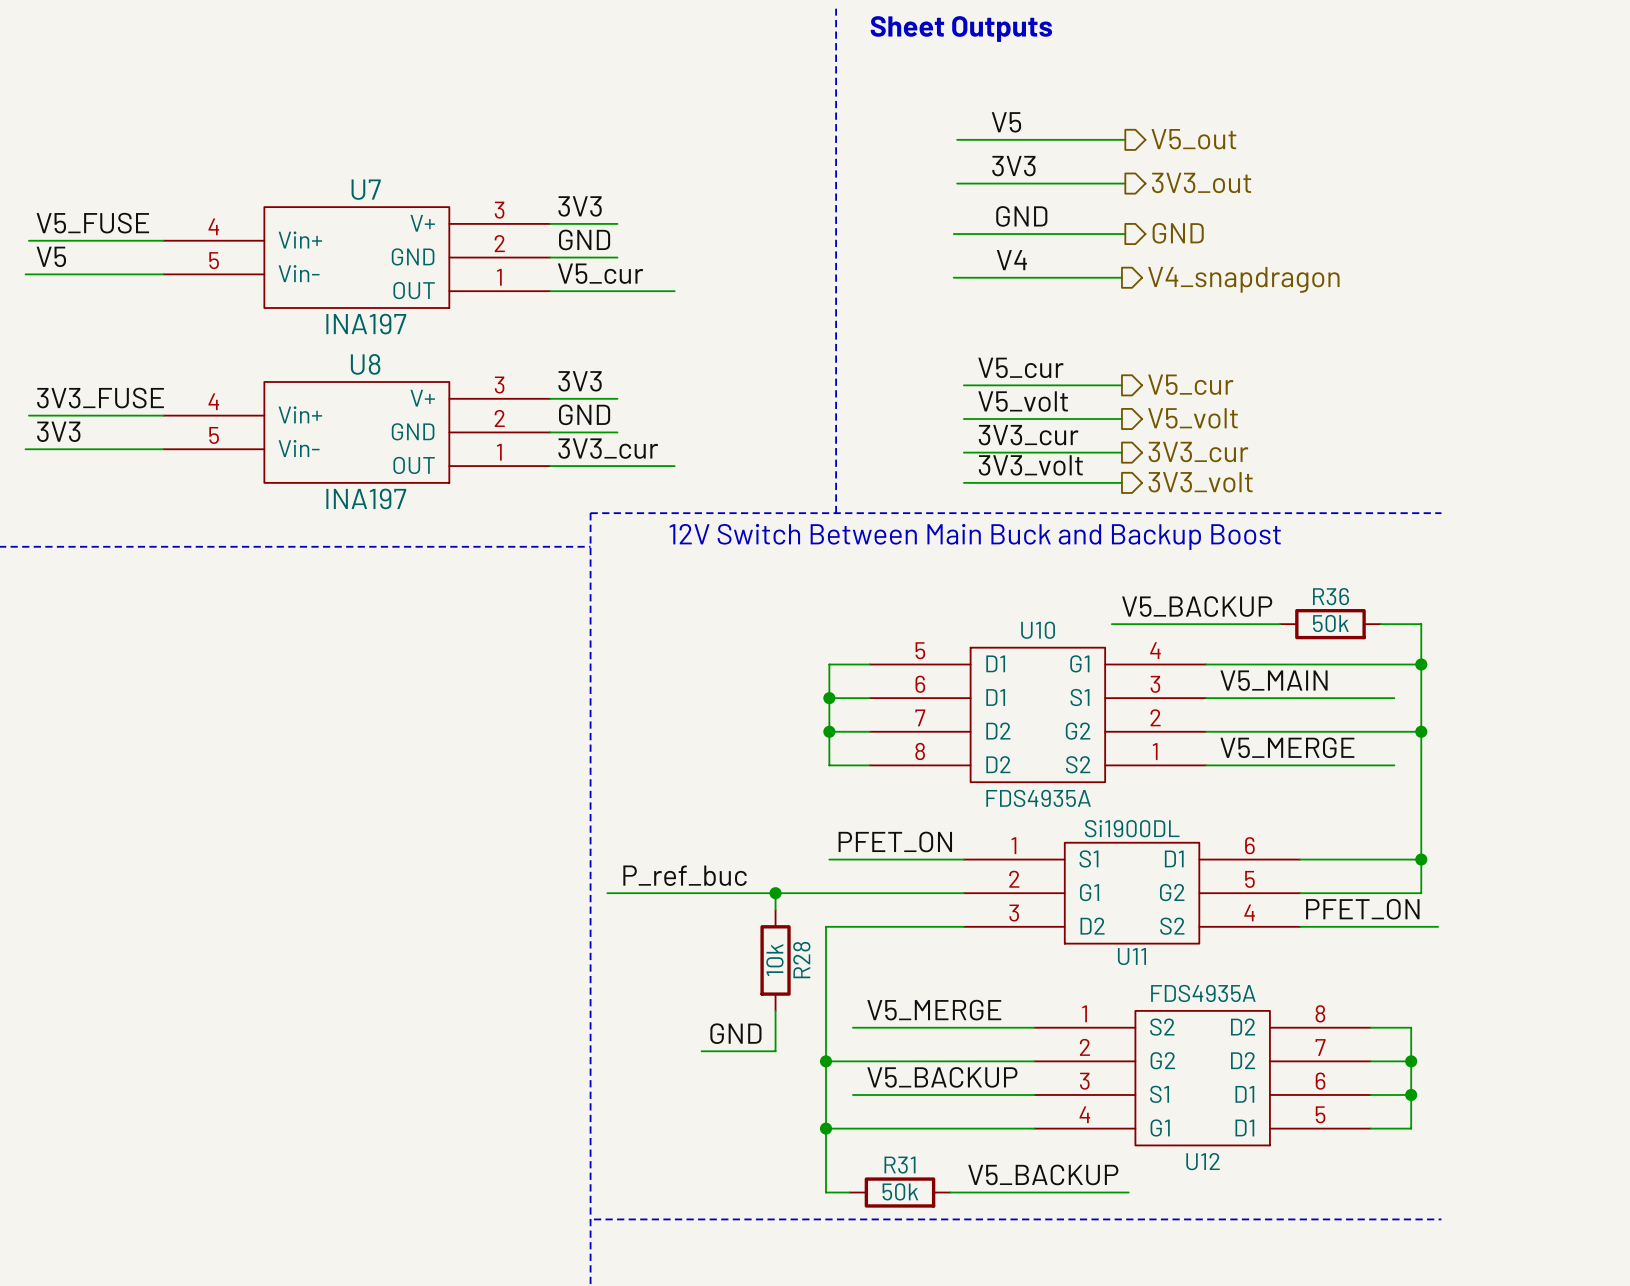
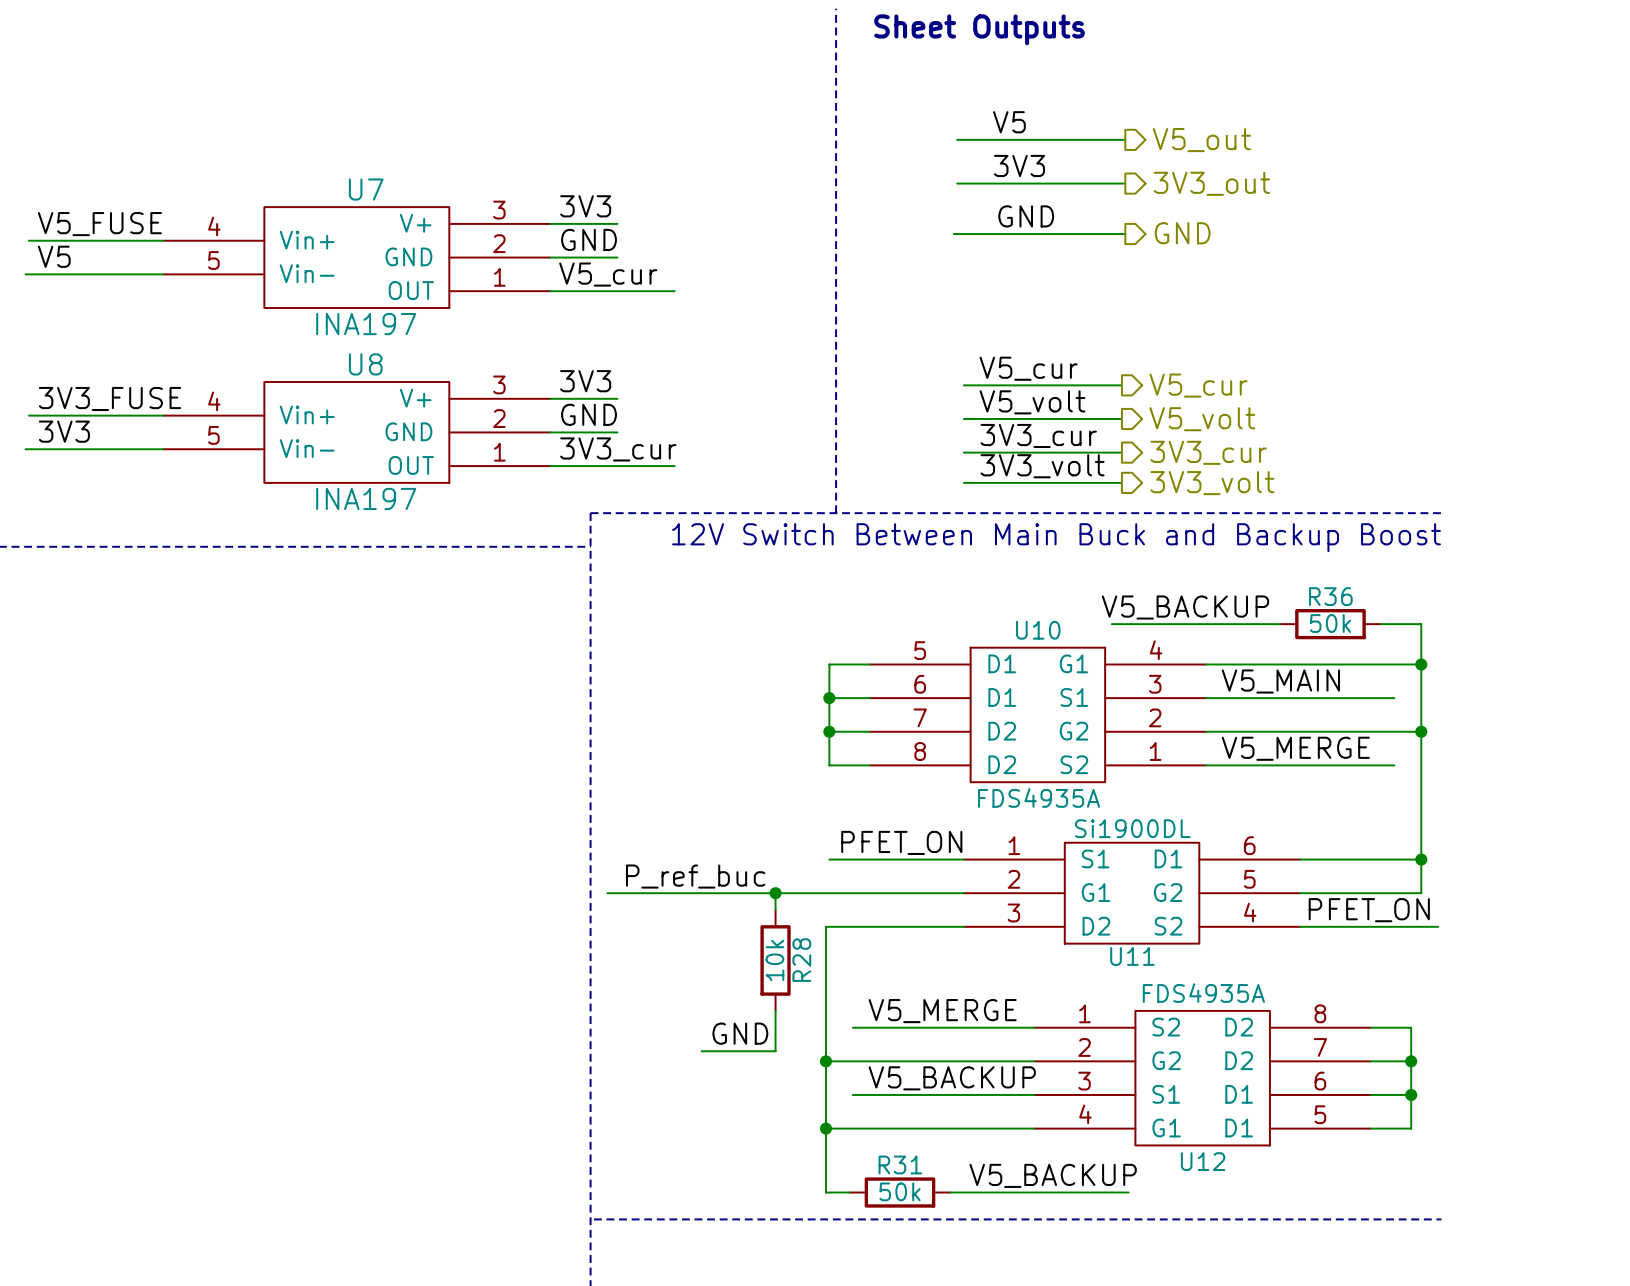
label: V4 (1011, 260) -> none
wire: (953, 277) (1121, 277) -> none
hierarchical label: V4_snapdragon (1243, 279) -> none

